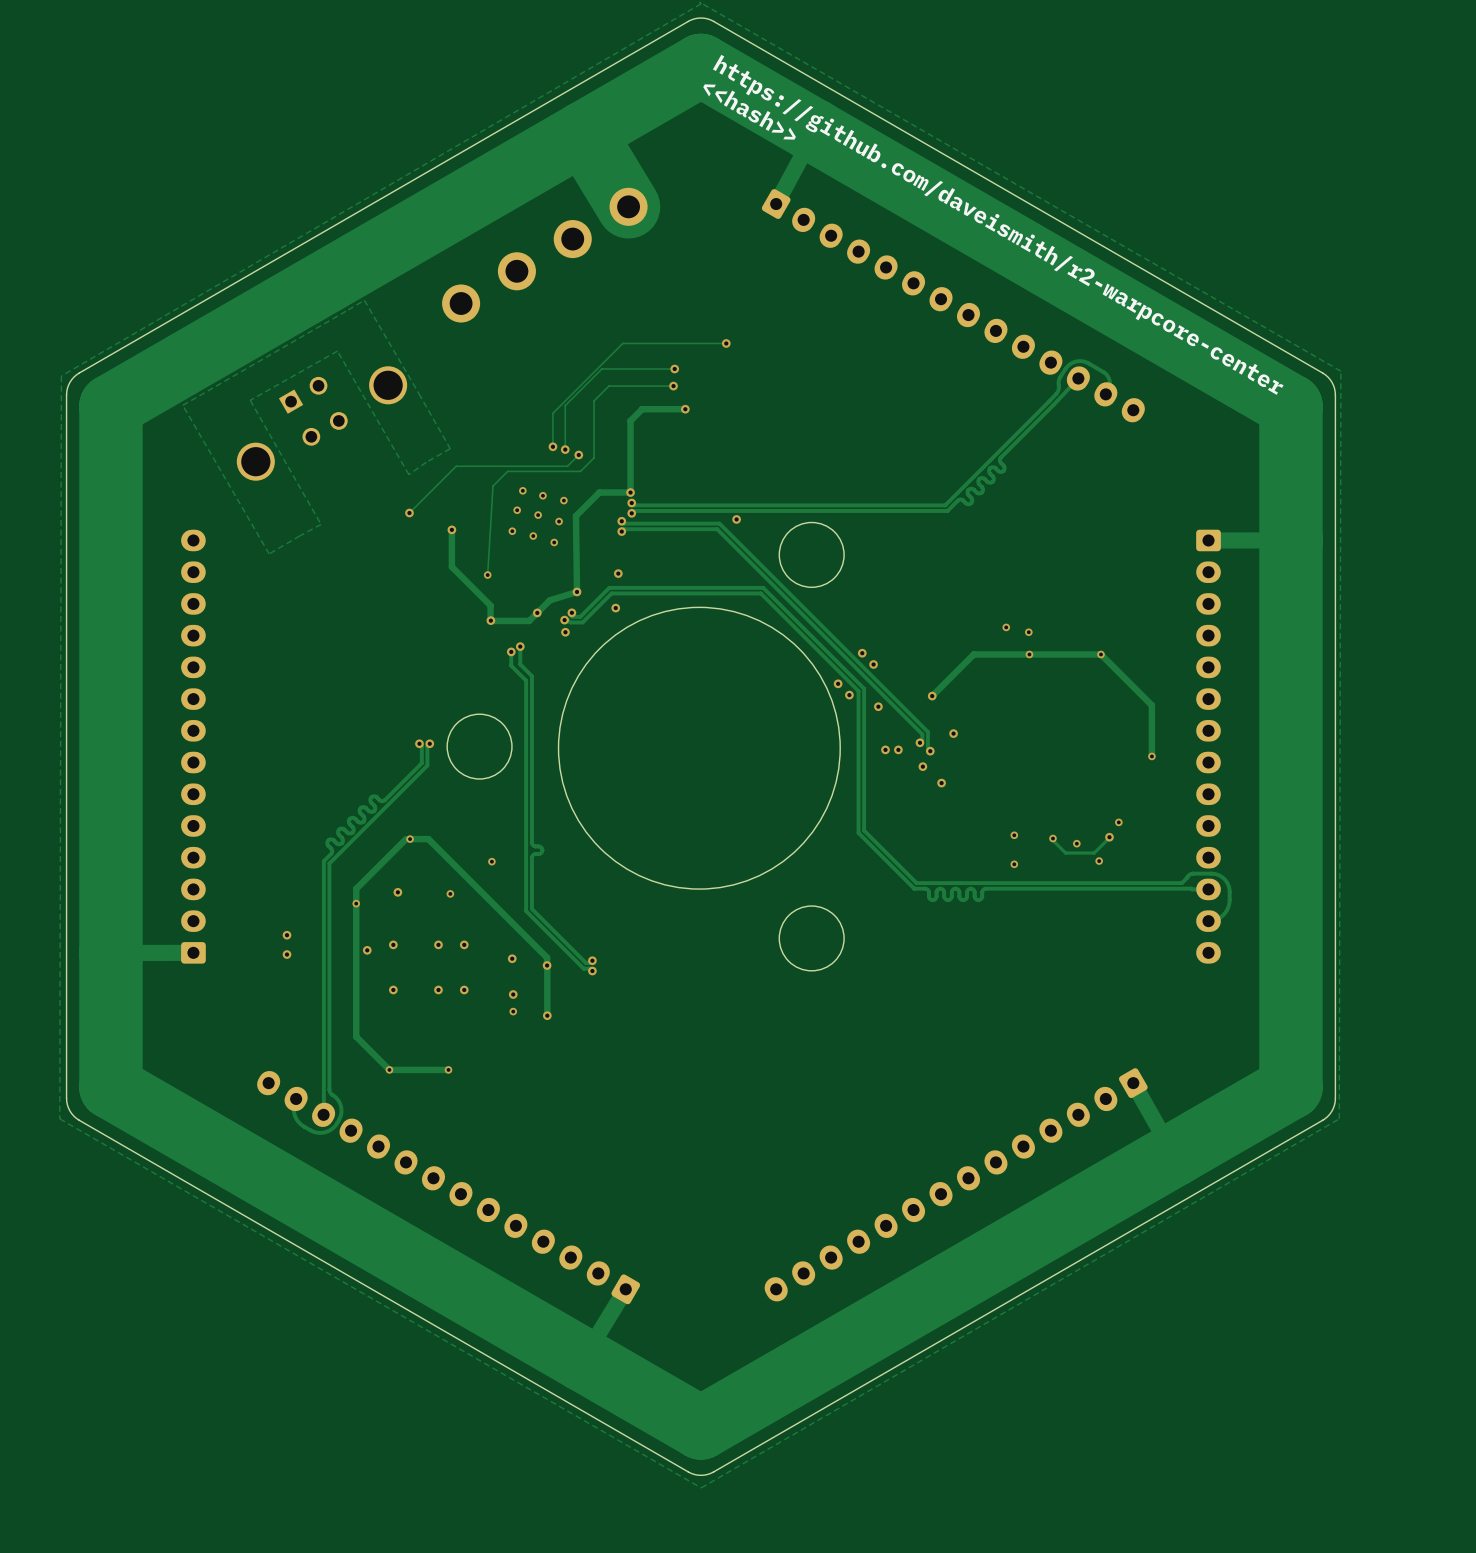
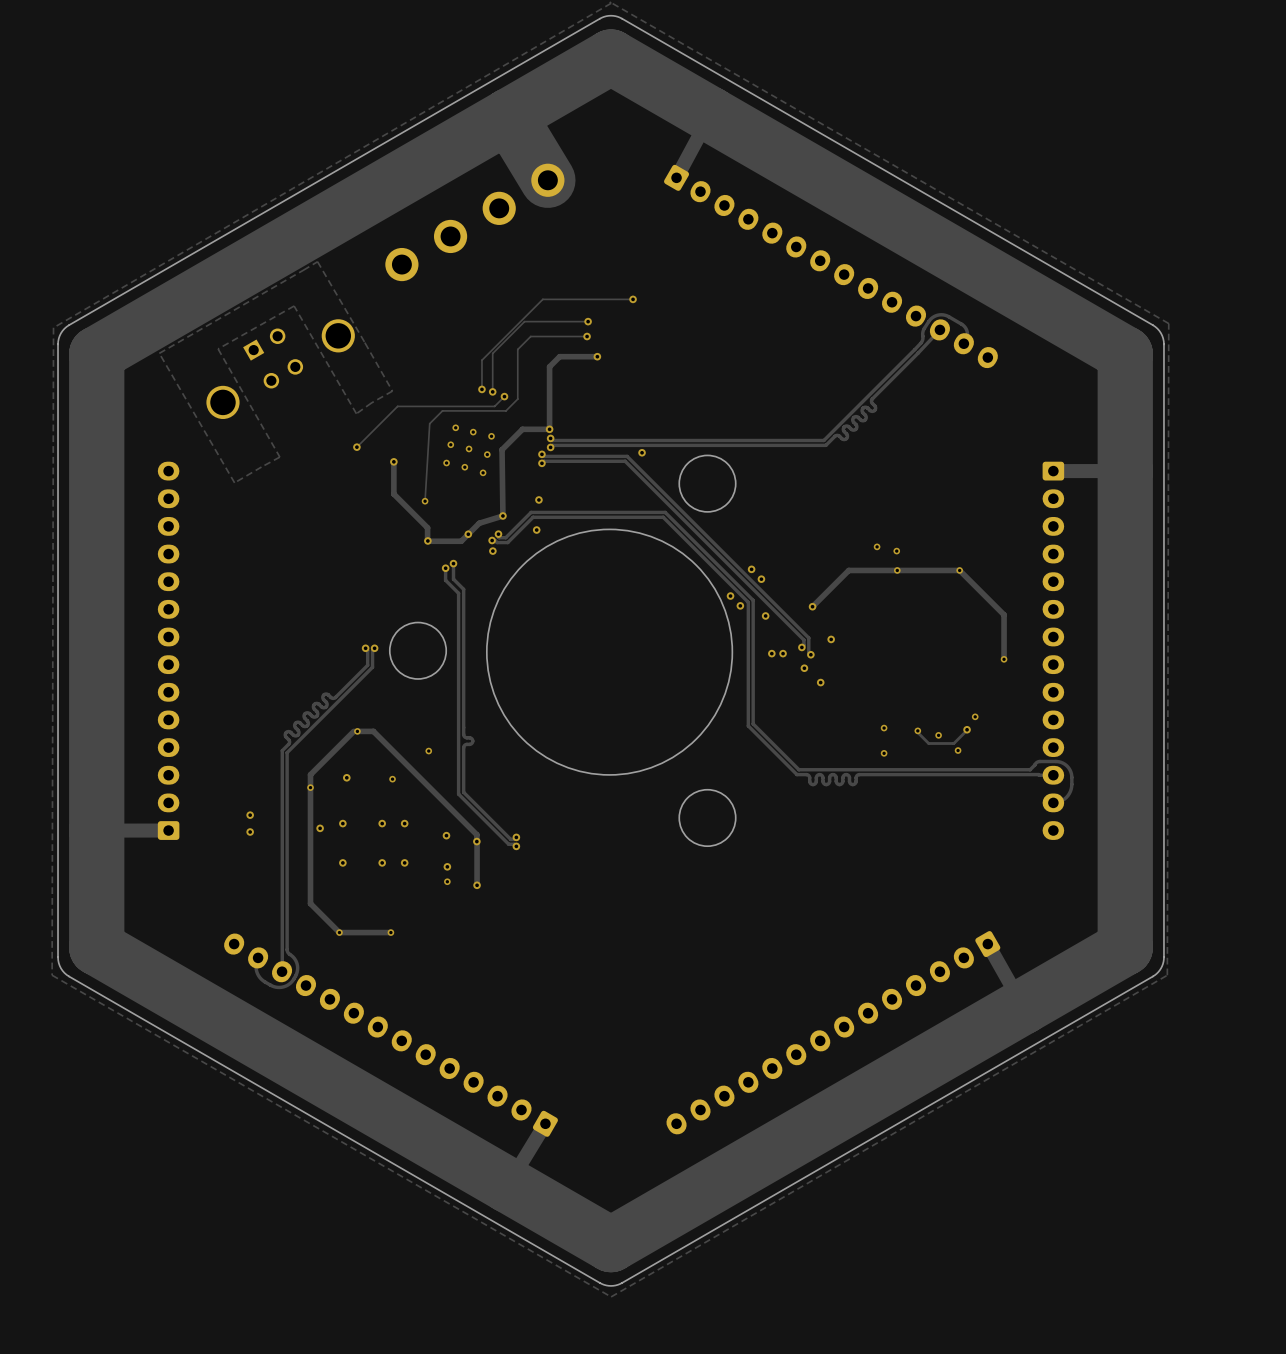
text: <<hash>> (749, 112) -> none
text: https://github.com/daveismith/r2-warpcore-center (998, 224) -> none

